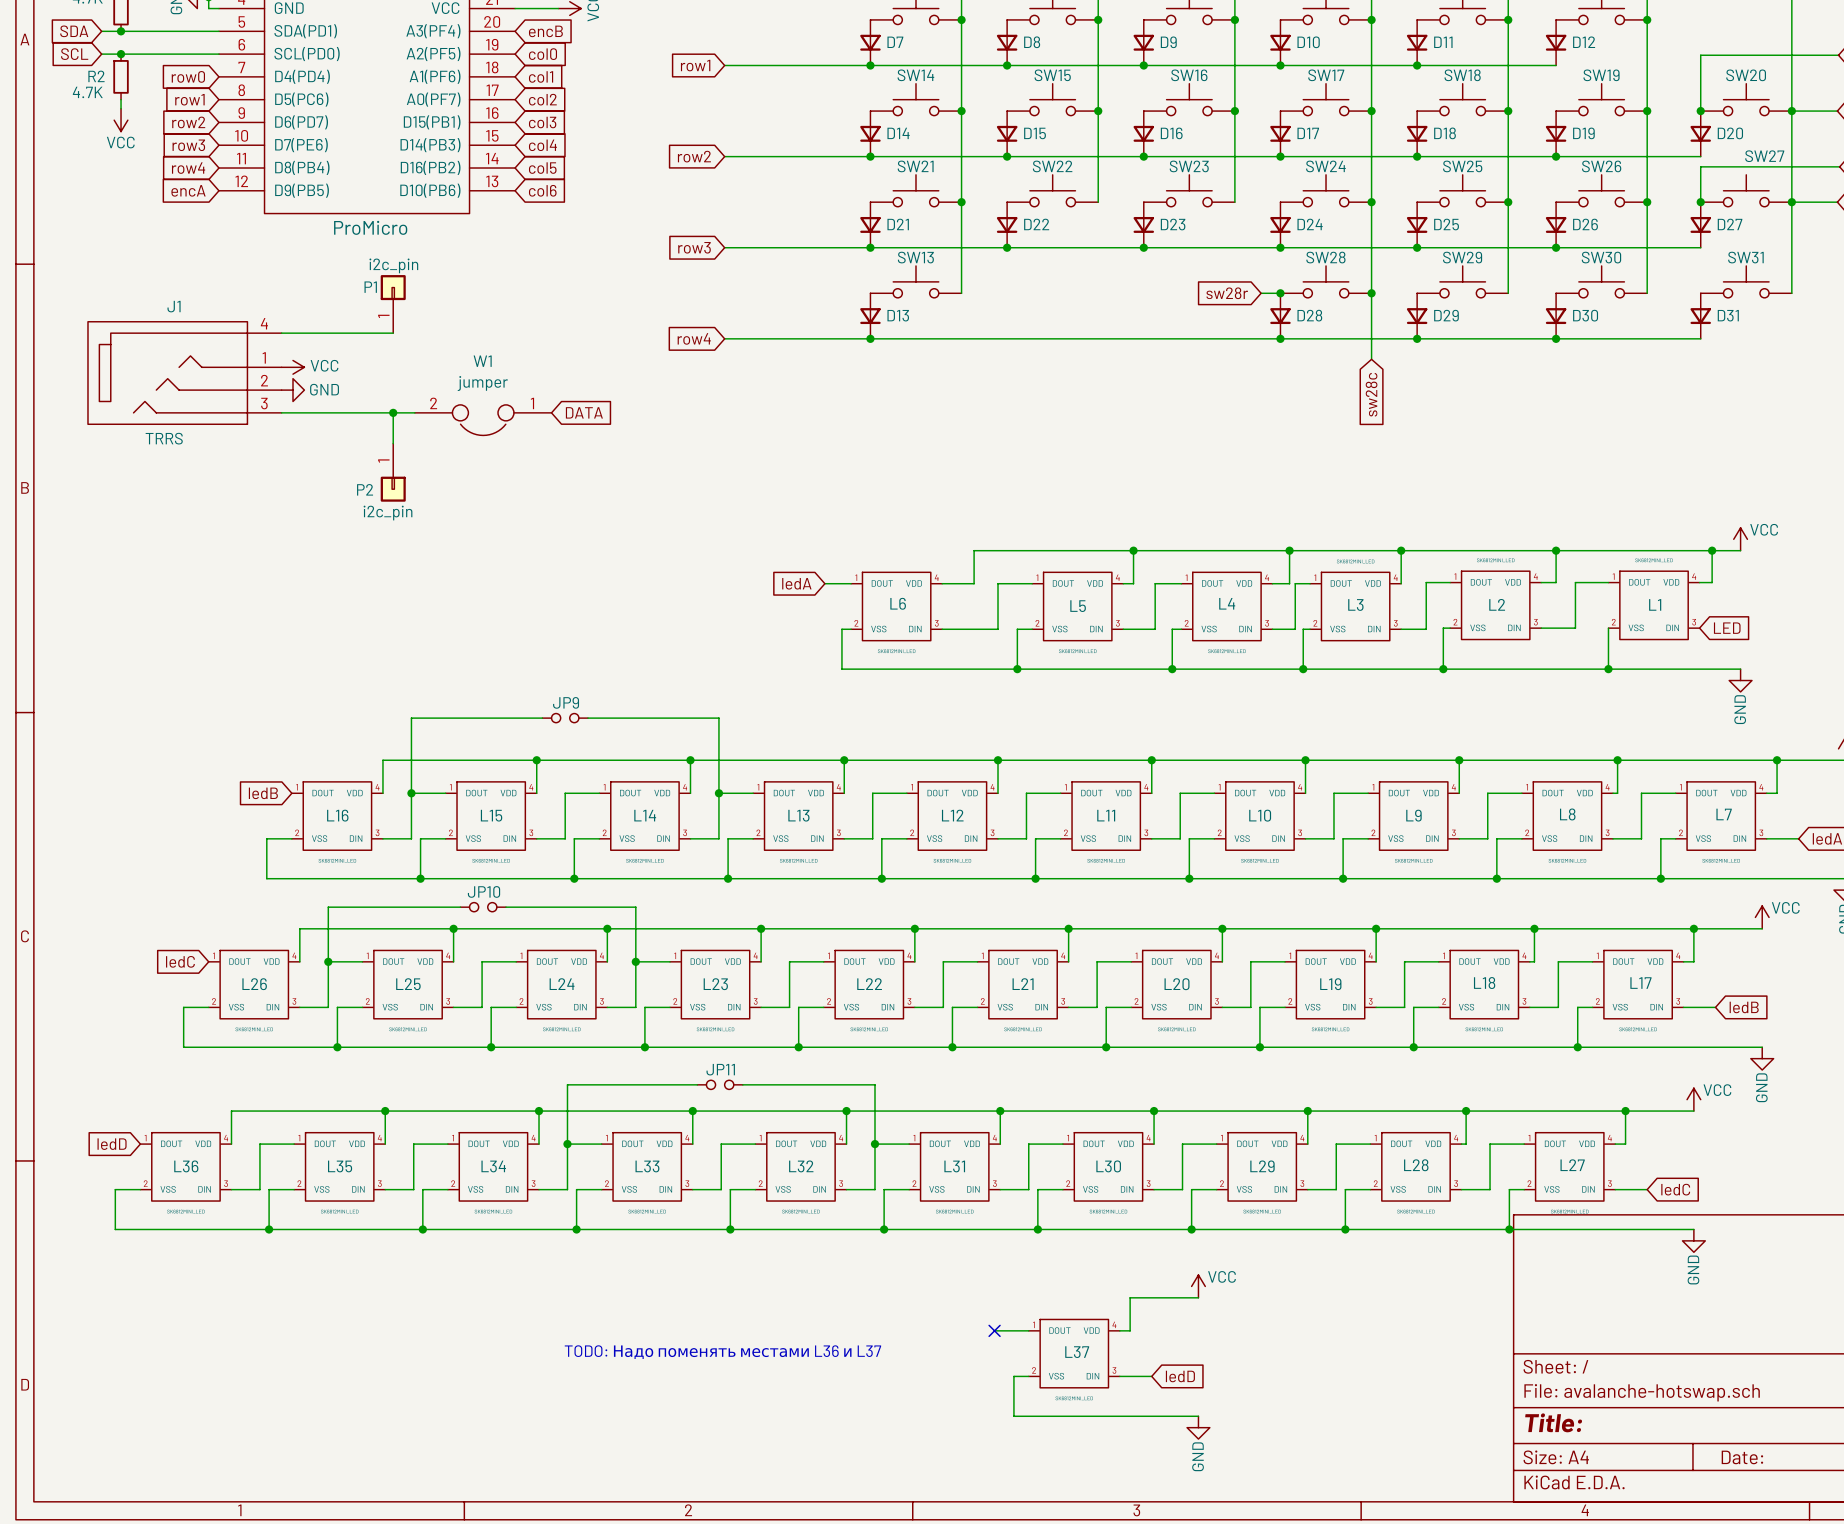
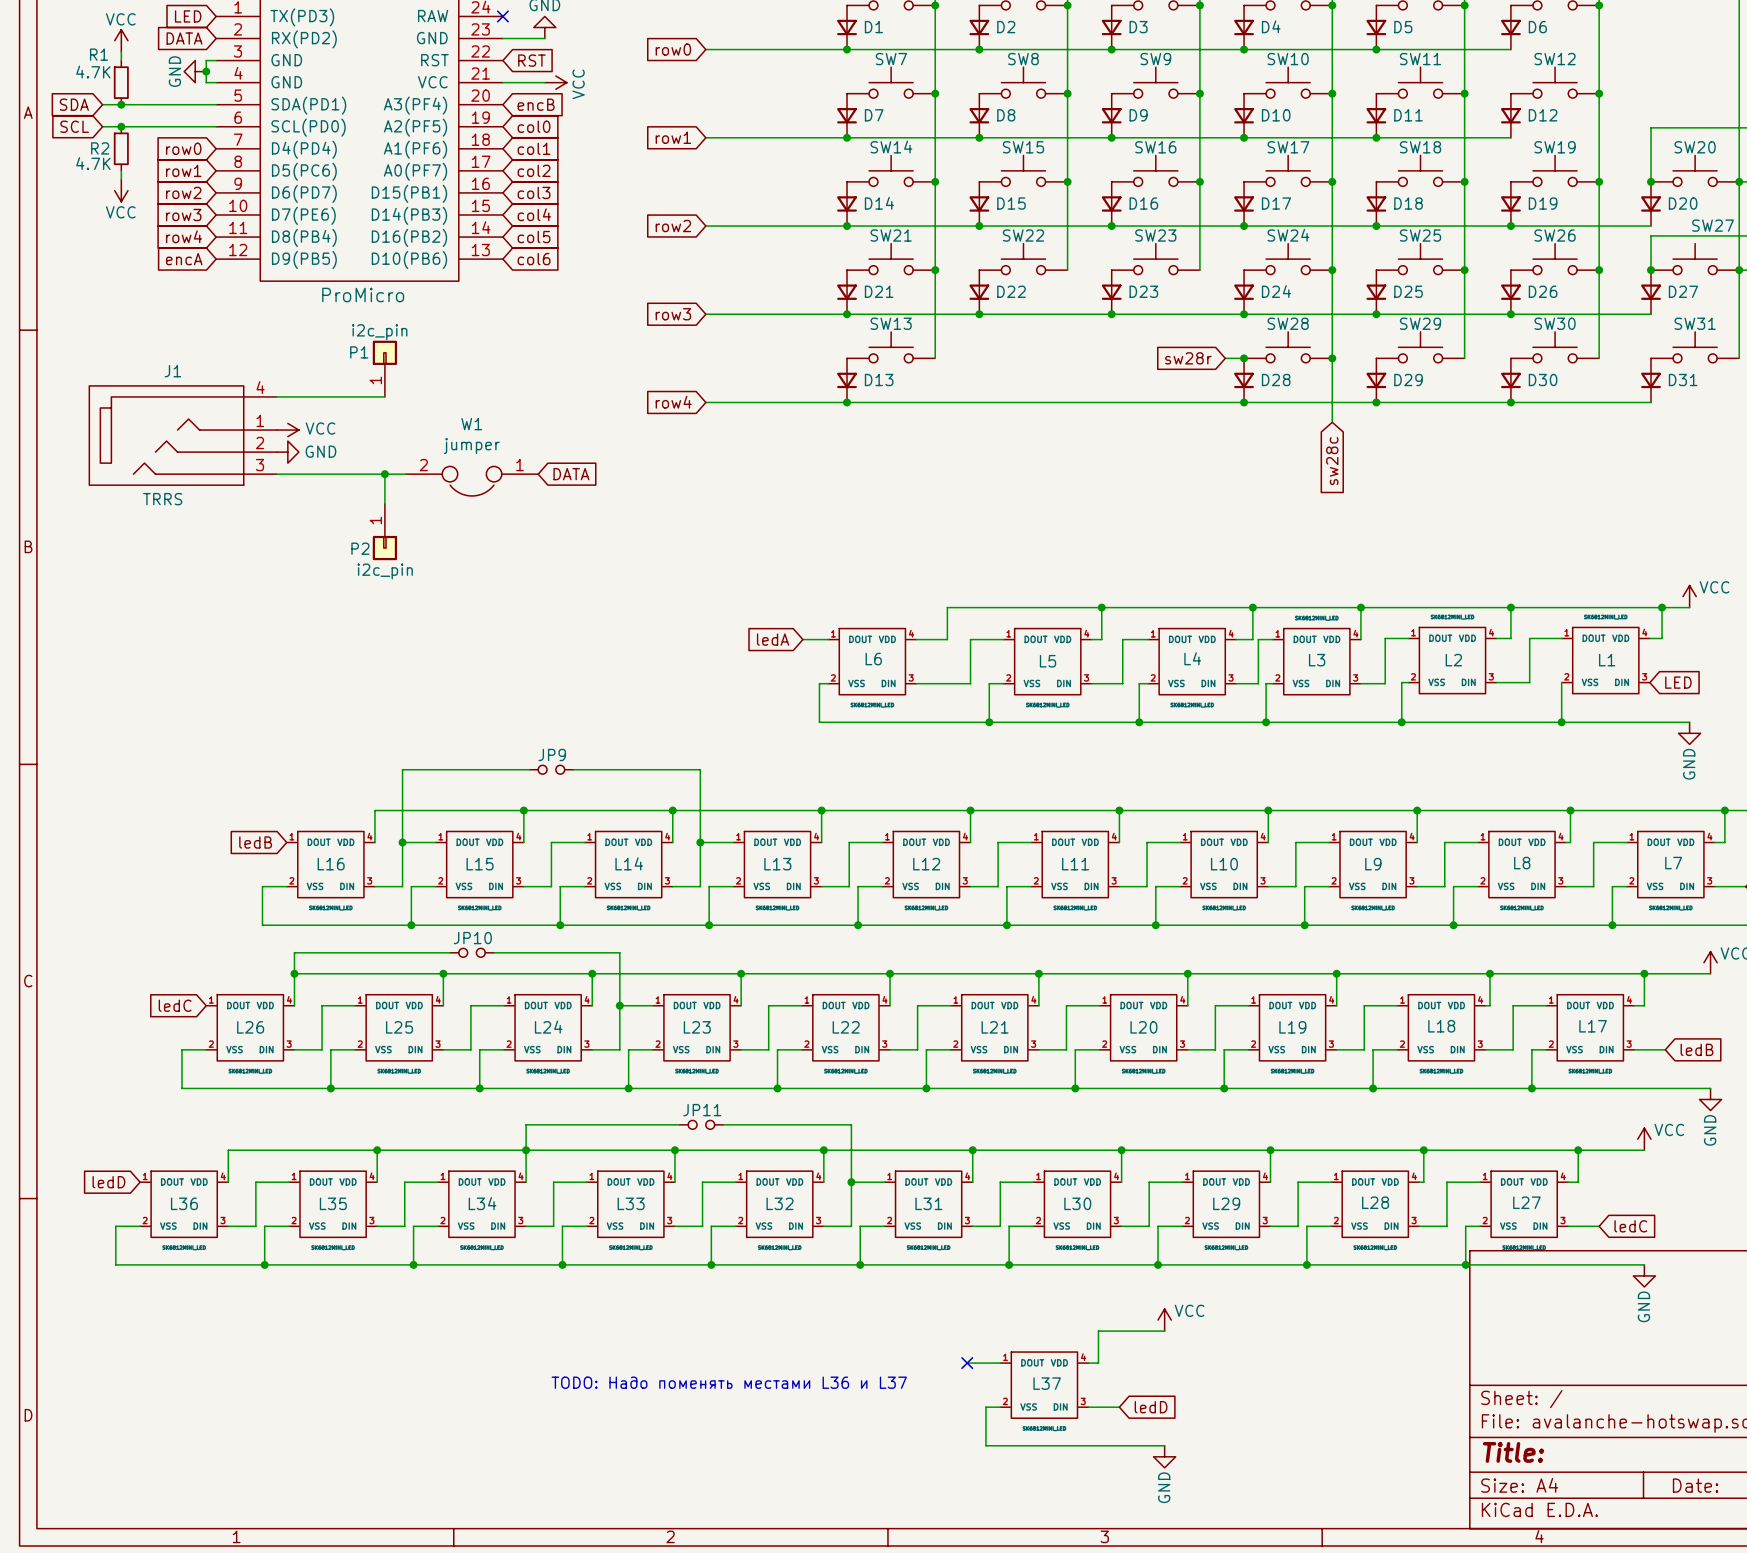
wire: (328, 907) (328, 961) -> (322, 952) (294, 952) (294, 973)
junction position: (328, 961) -> (294, 973)
wire: (567, 1084) (567, 1144) -> (553, 1124) (526, 1124) (526, 1150)
junction: (567, 1144) -> none

